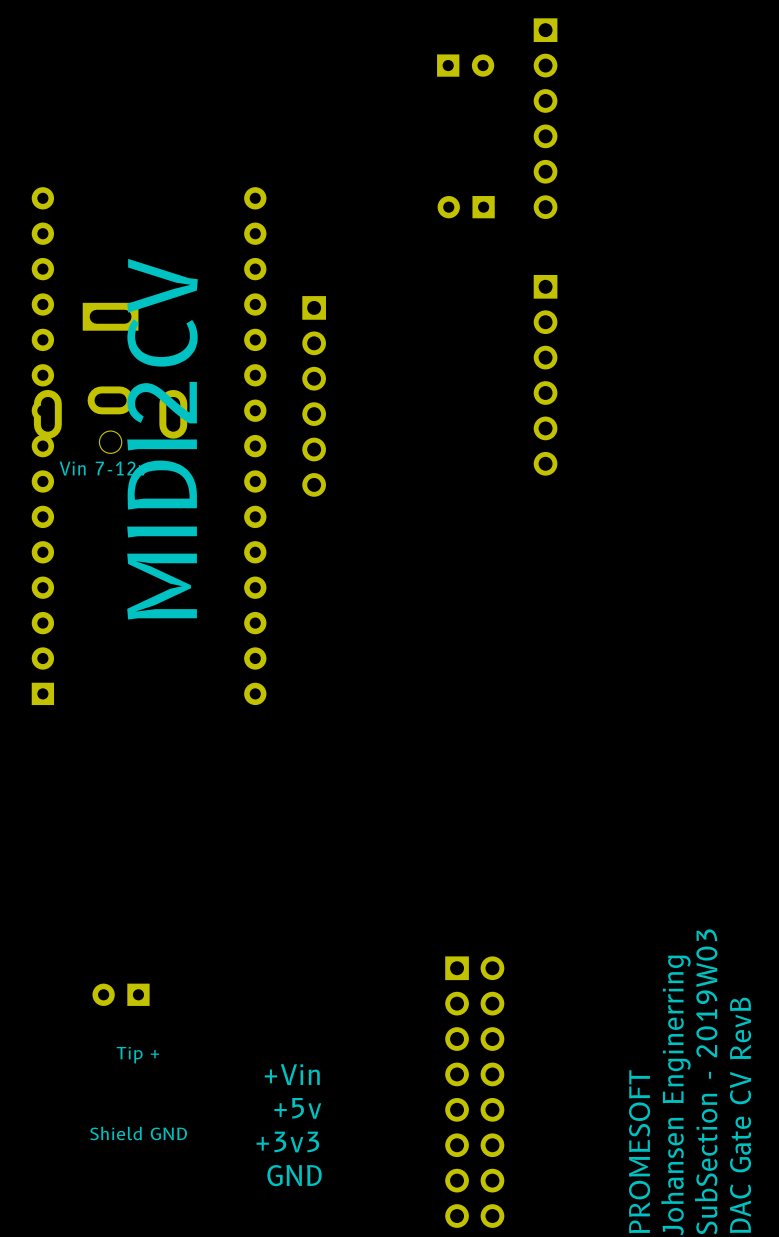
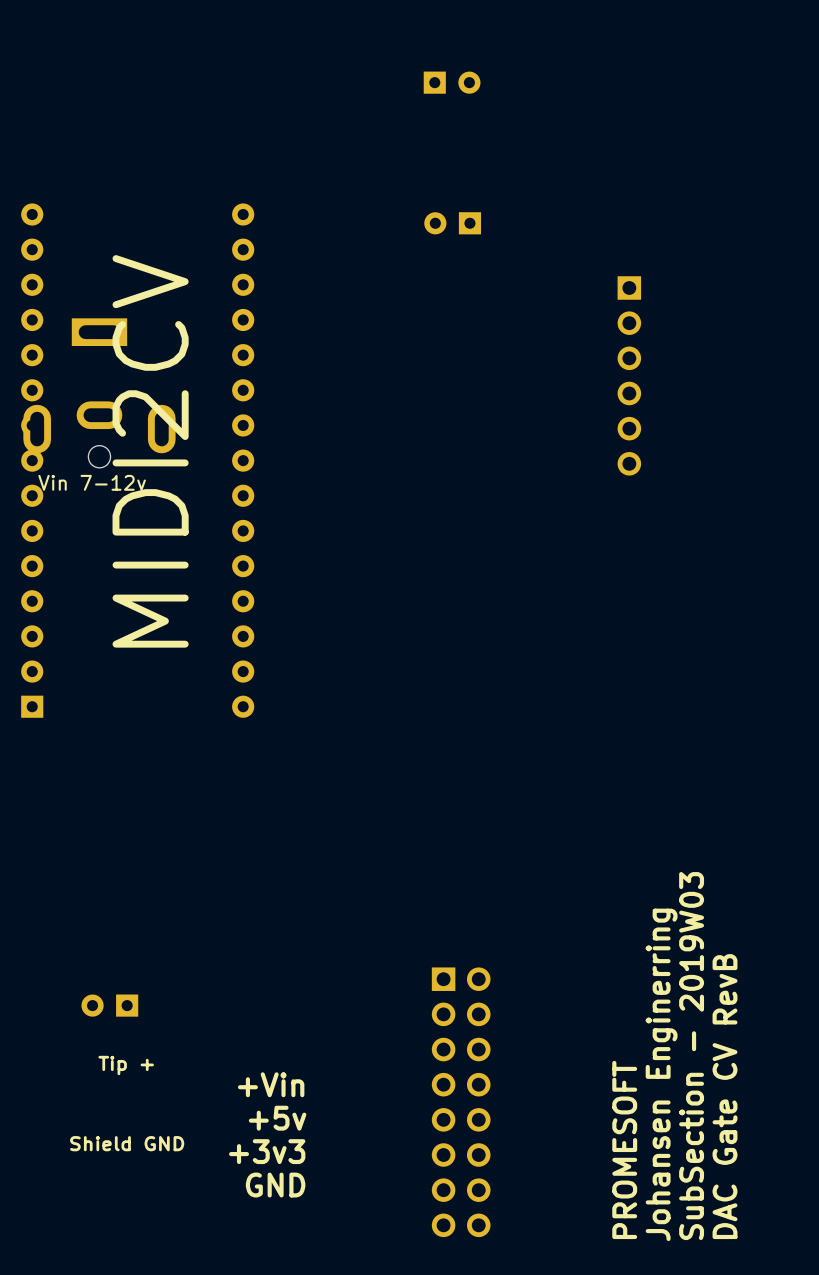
part: (545, 118) -> none
part position: (545, 375) -> (629, 375)
part: (314, 396) -> none

